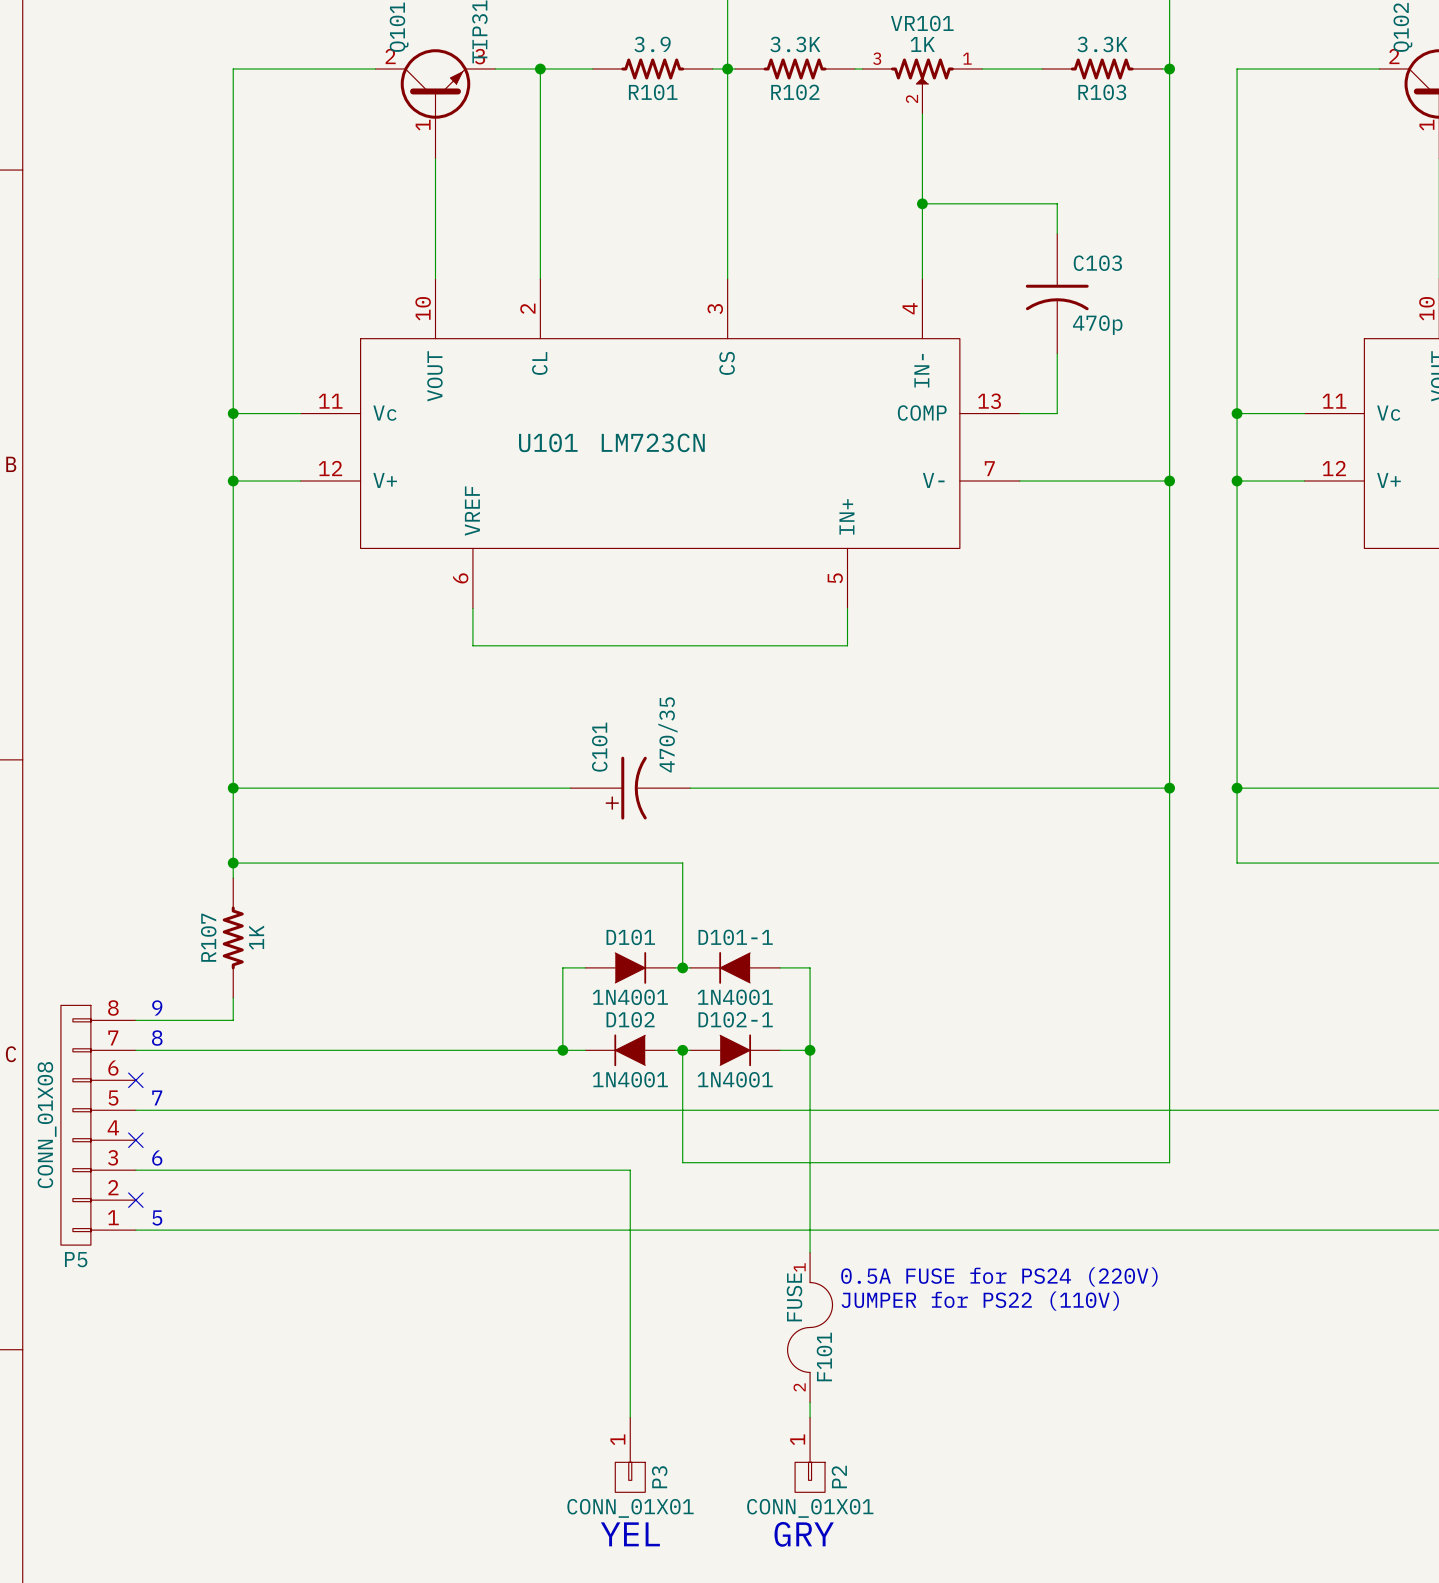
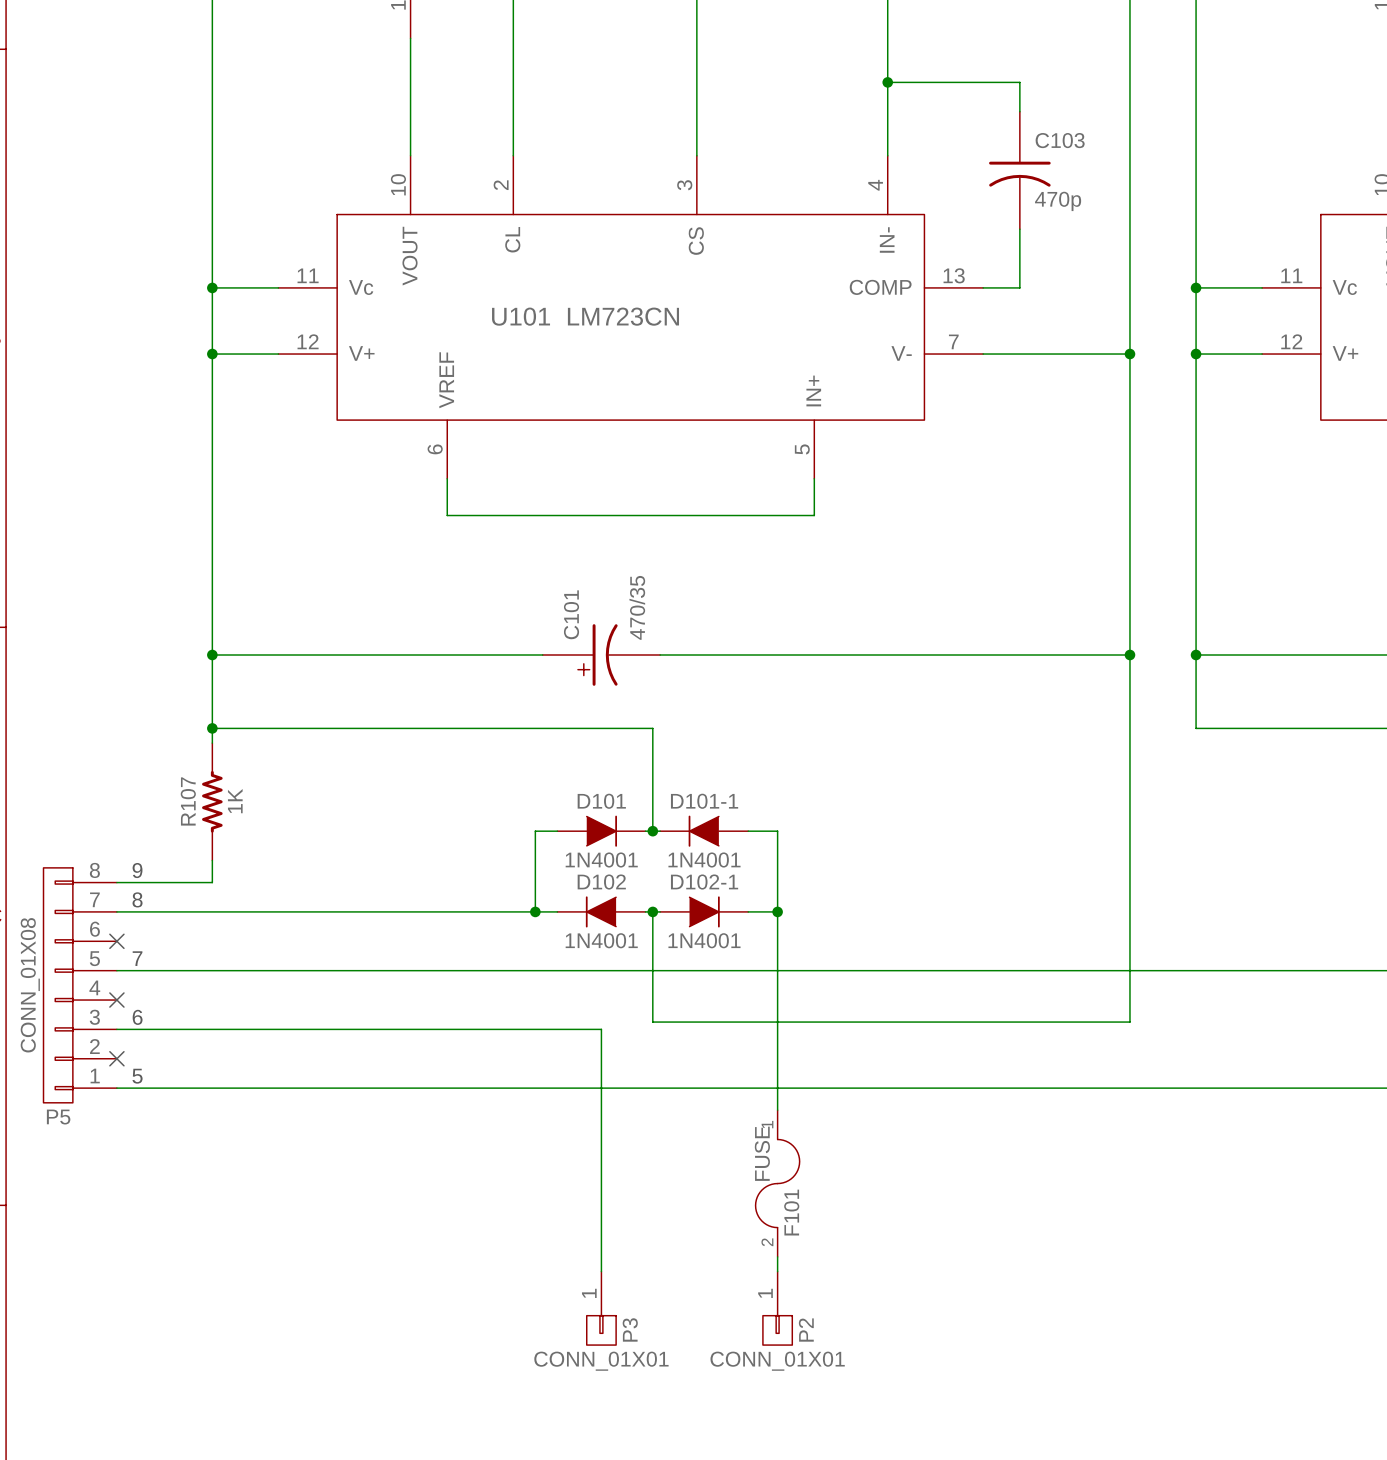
text: 0.5A FUSE for PS24 (220V) (999, 1276) -> none
text: JUMPER for PS22 (110V) (980, 1301) -> none
text: YEL (630, 1534) -> none
text: GRY (804, 1534) -> none

